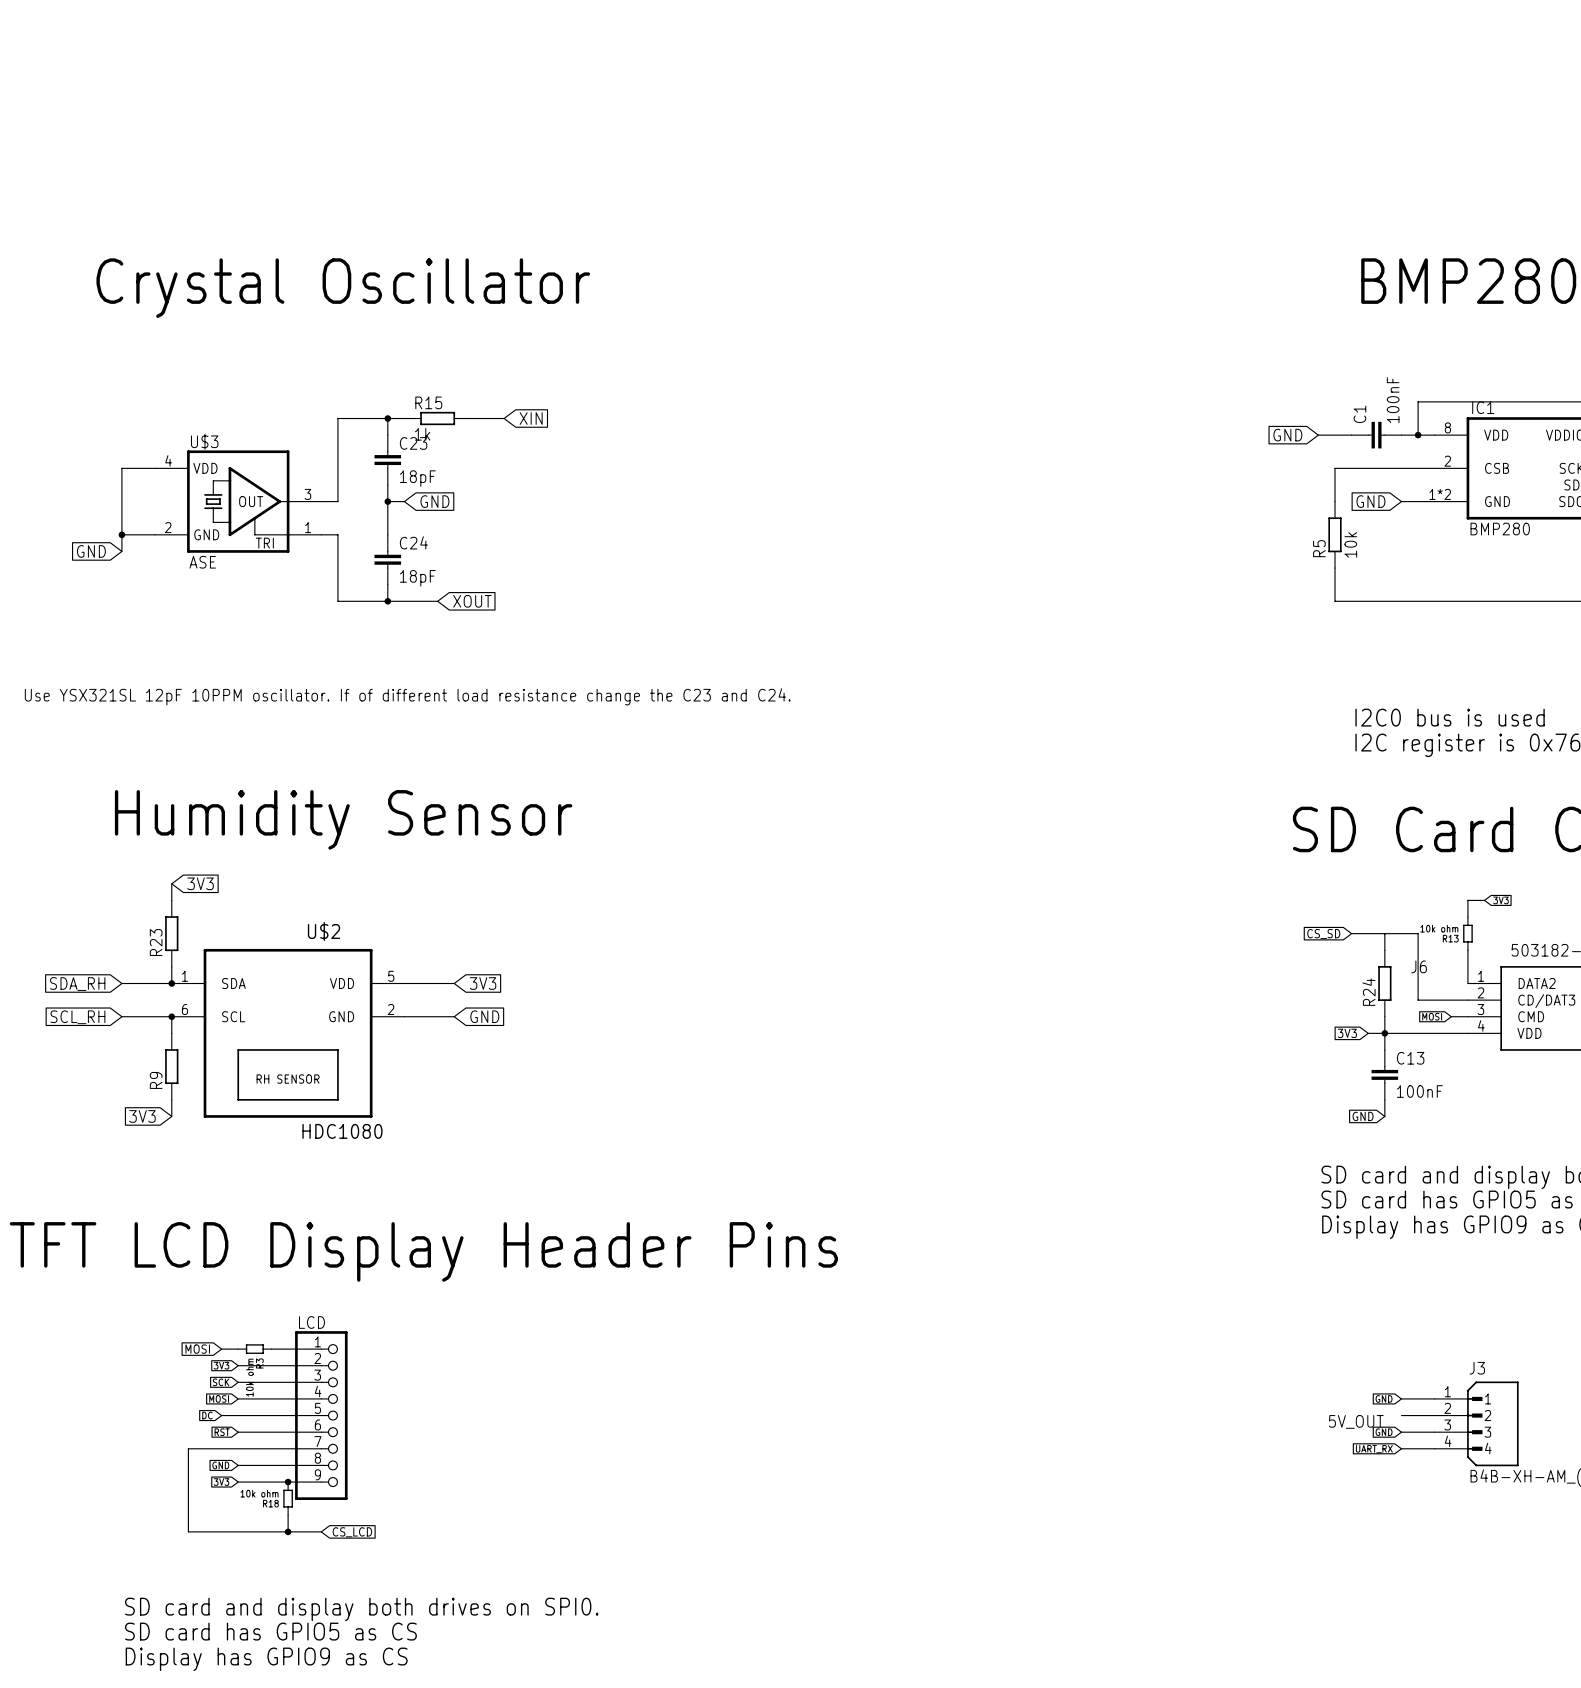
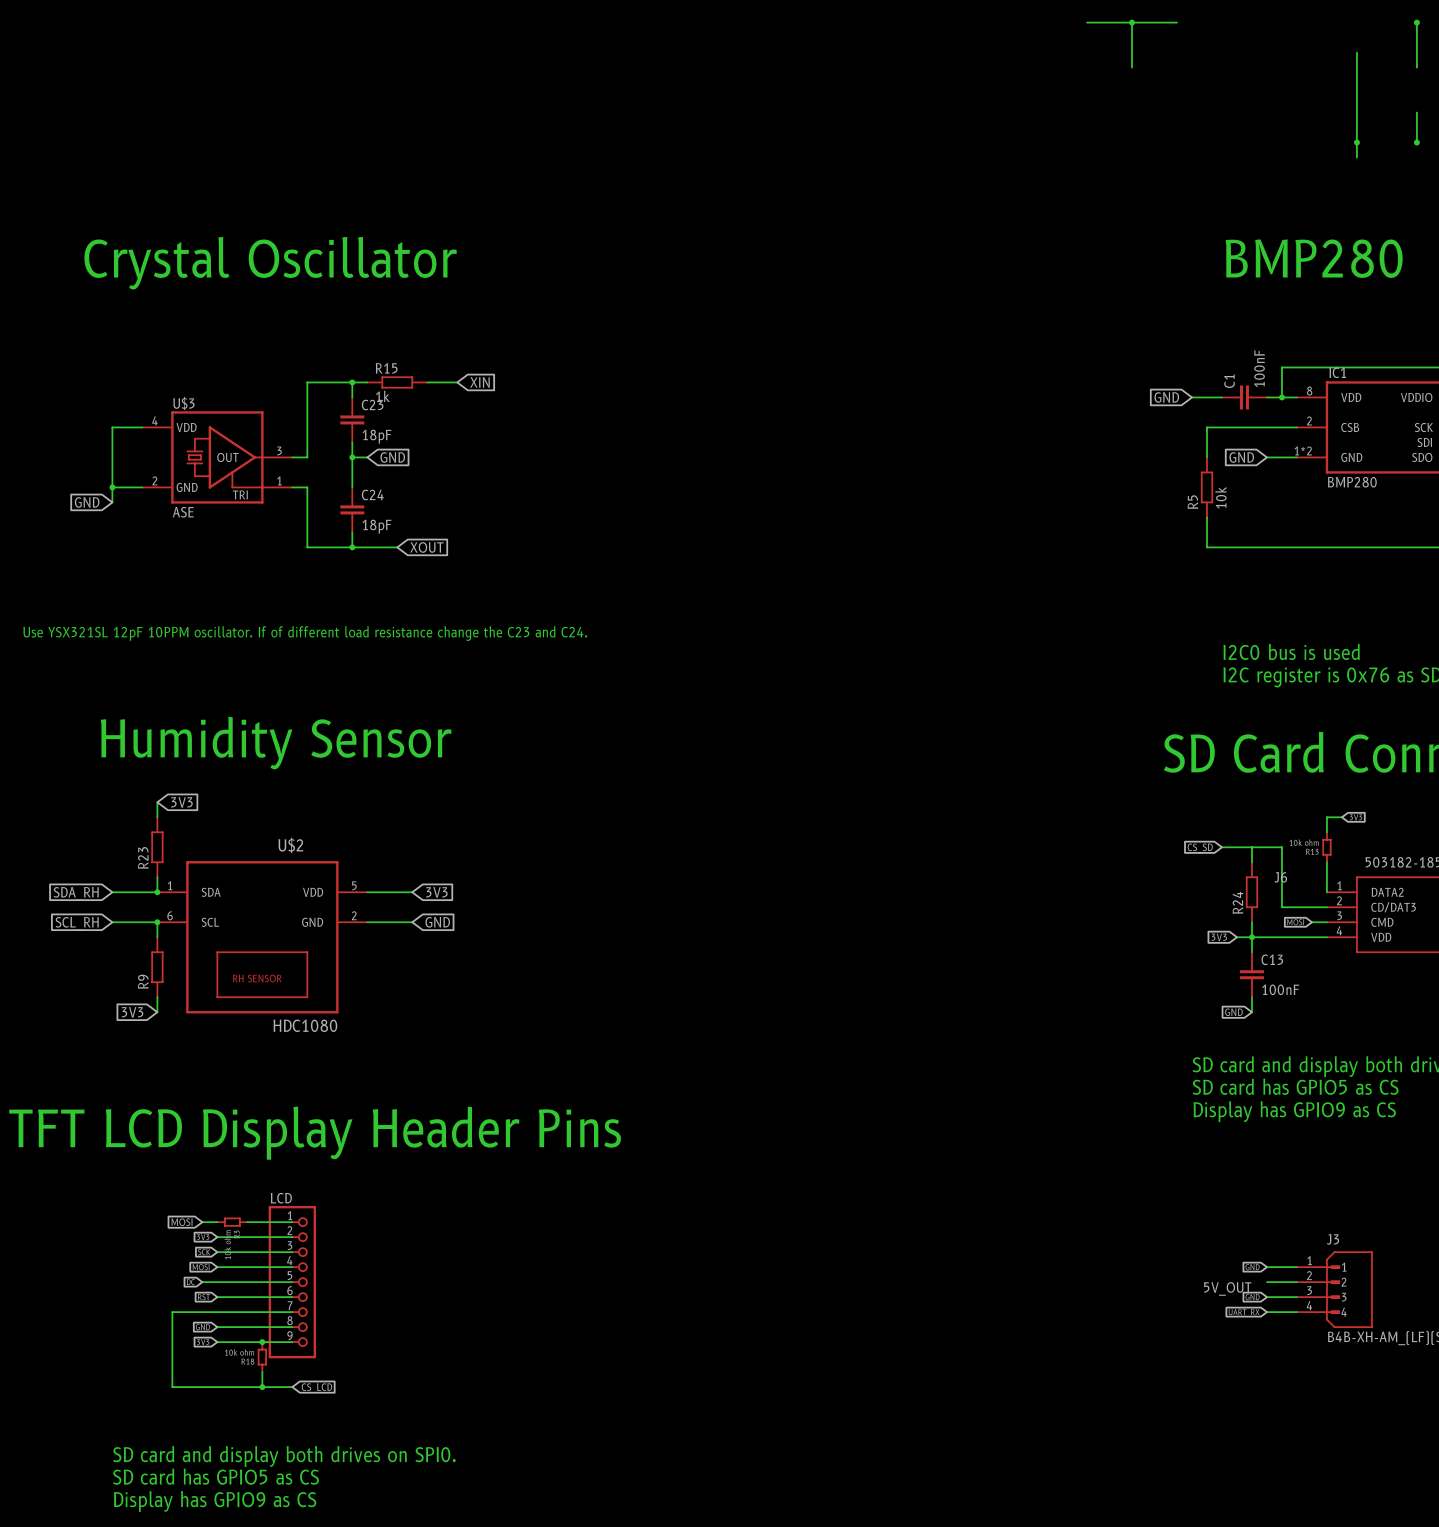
wire: none -> (1087, 22) (1177, 22)
wire: none -> (1132, 22) (1132, 67)
junction: none -> (1132, 22)
wire: none -> (1416, 22) (1416, 67)
junction: none -> (1416, 22)
wire: none -> (1356, 52) (1356, 157)
wire: none -> (1416, 112) (1416, 142)
junction: none -> (1356, 142)
junction: none -> (1416, 142)

